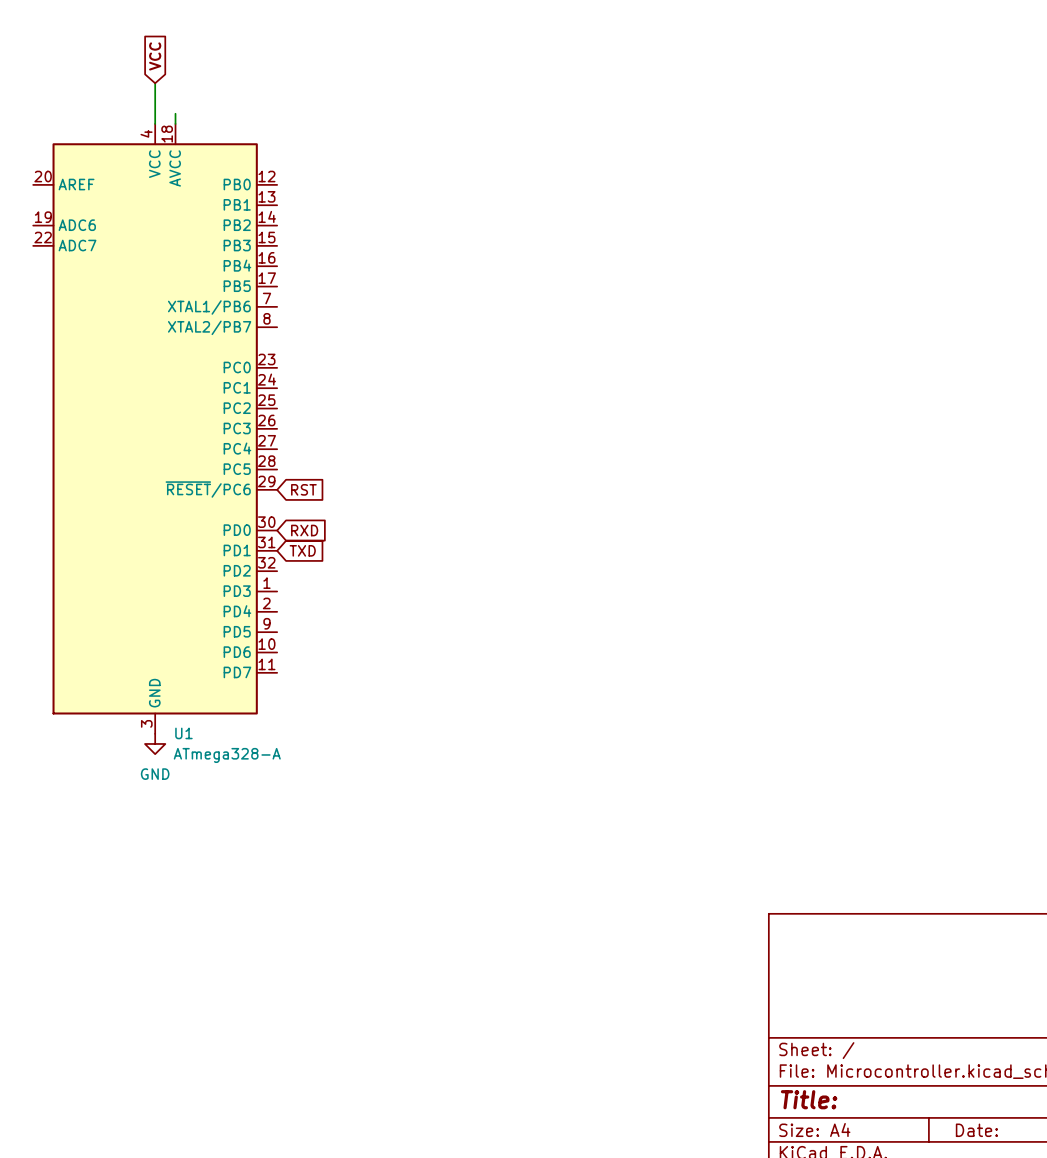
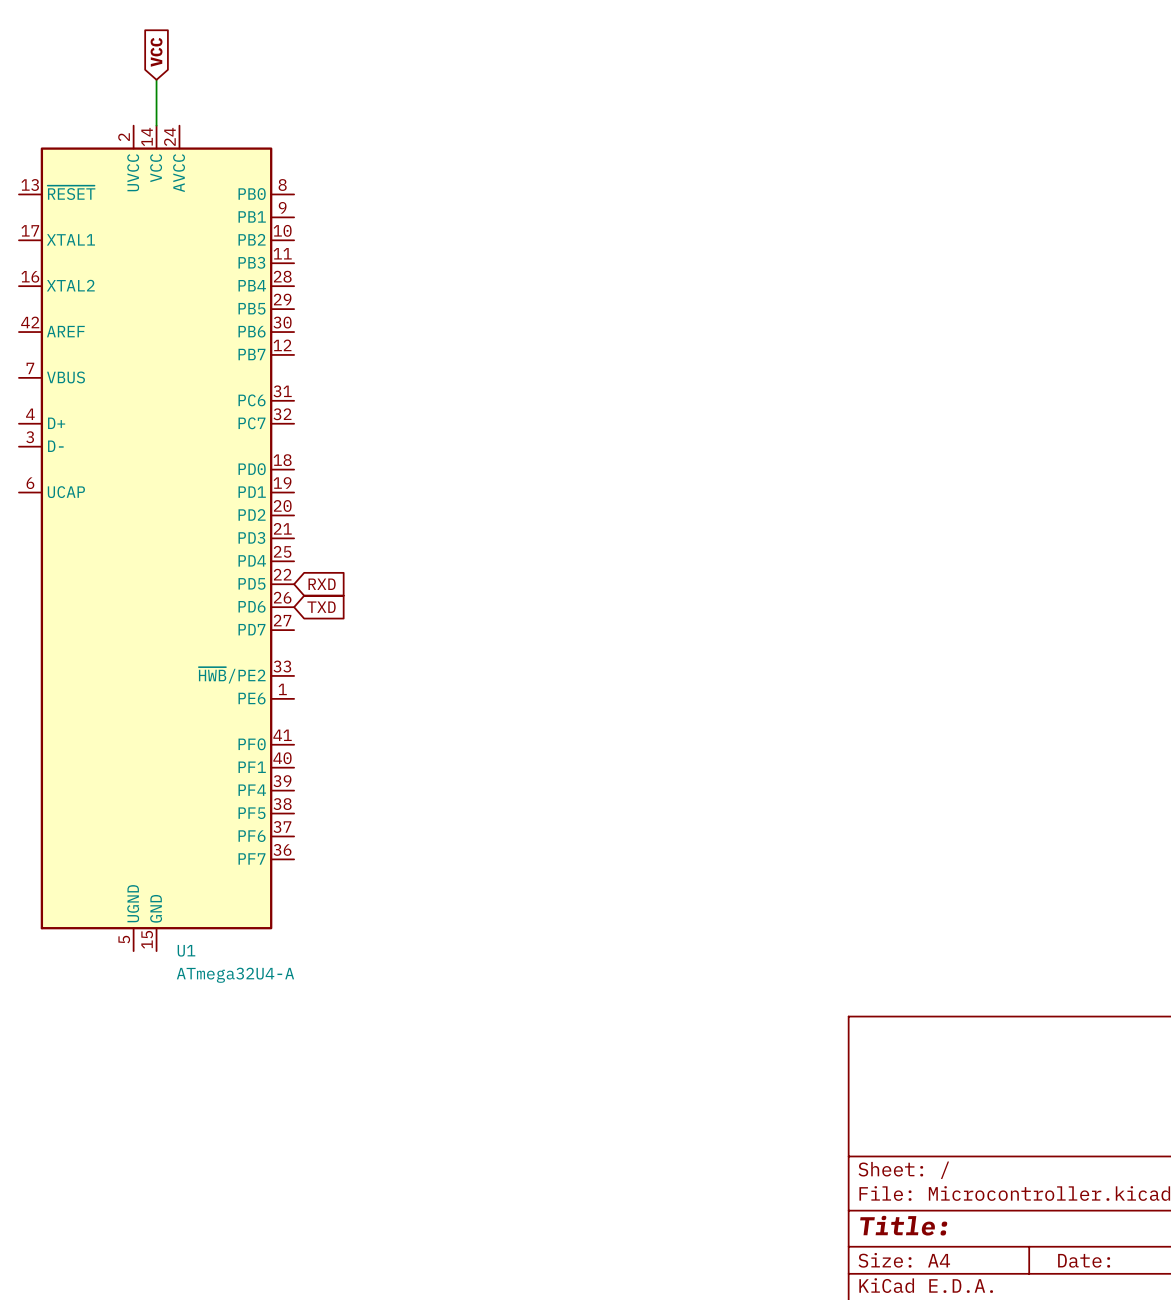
wire: (175, 113) (175, 123) -> none
U1 symbol: [33, 123, 278, 734] -> [18, 125, 295, 952]
global label: RST (303, 489) -> none
U1 name position: U1 (183, 733) -> U1 (186, 950)
power symbol: GND (155, 743) -> none
U1 value: ATmega328-A (227, 755) -> ATmega32U4-A (235, 975)

